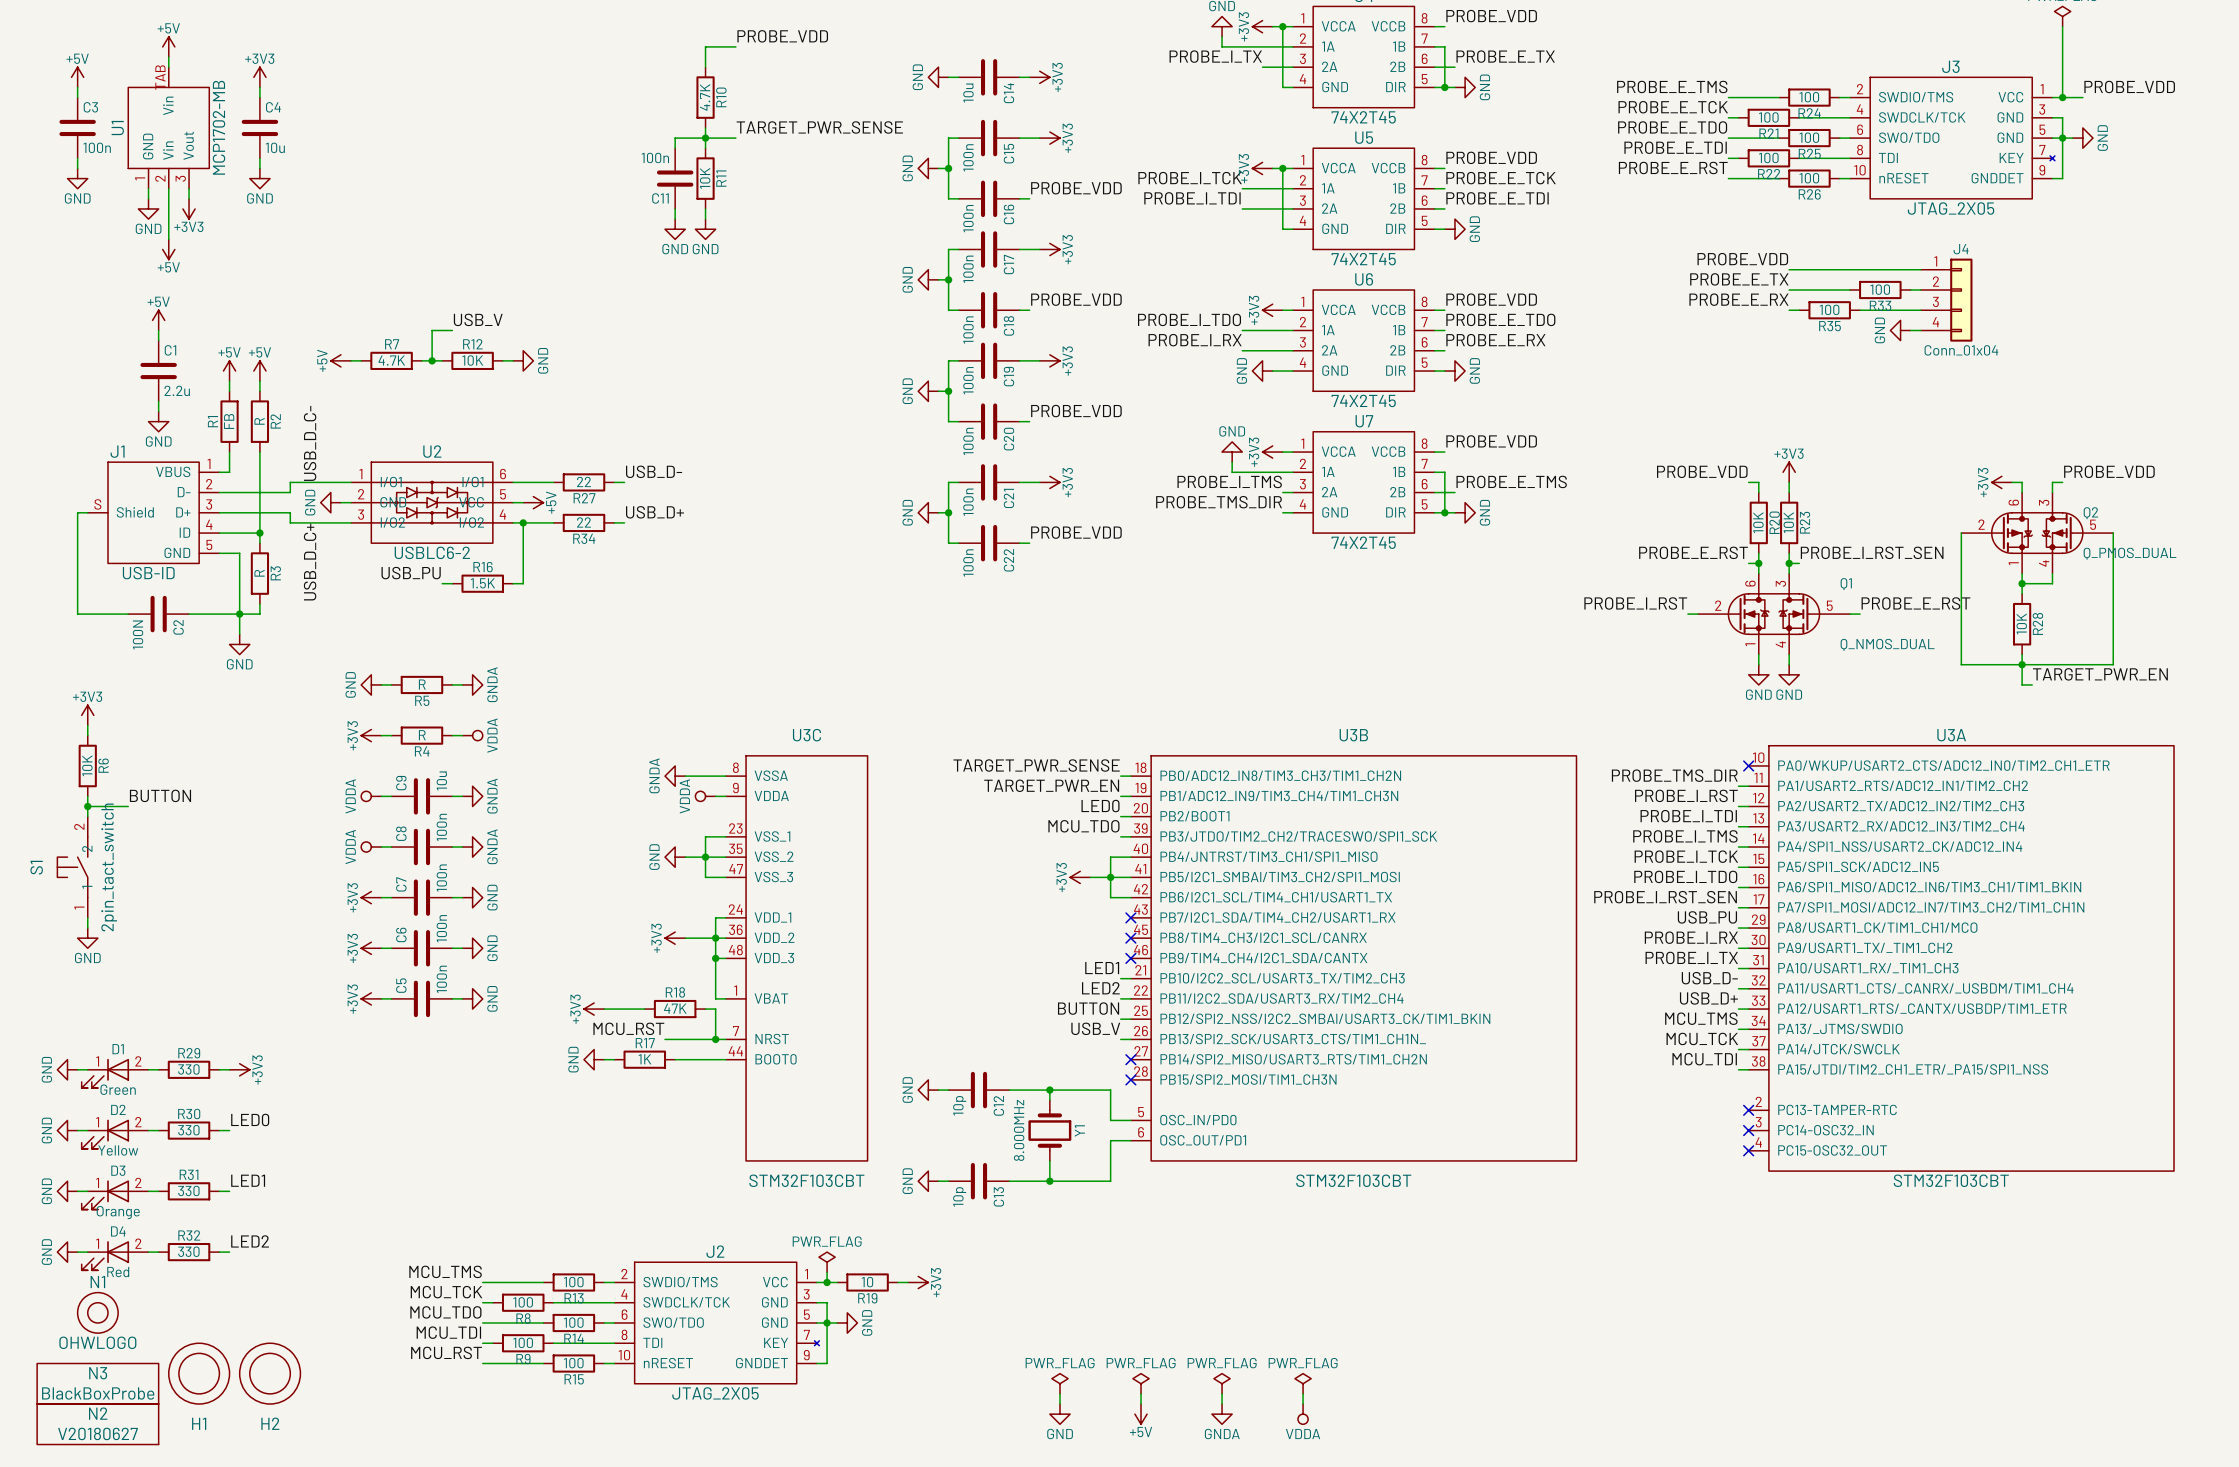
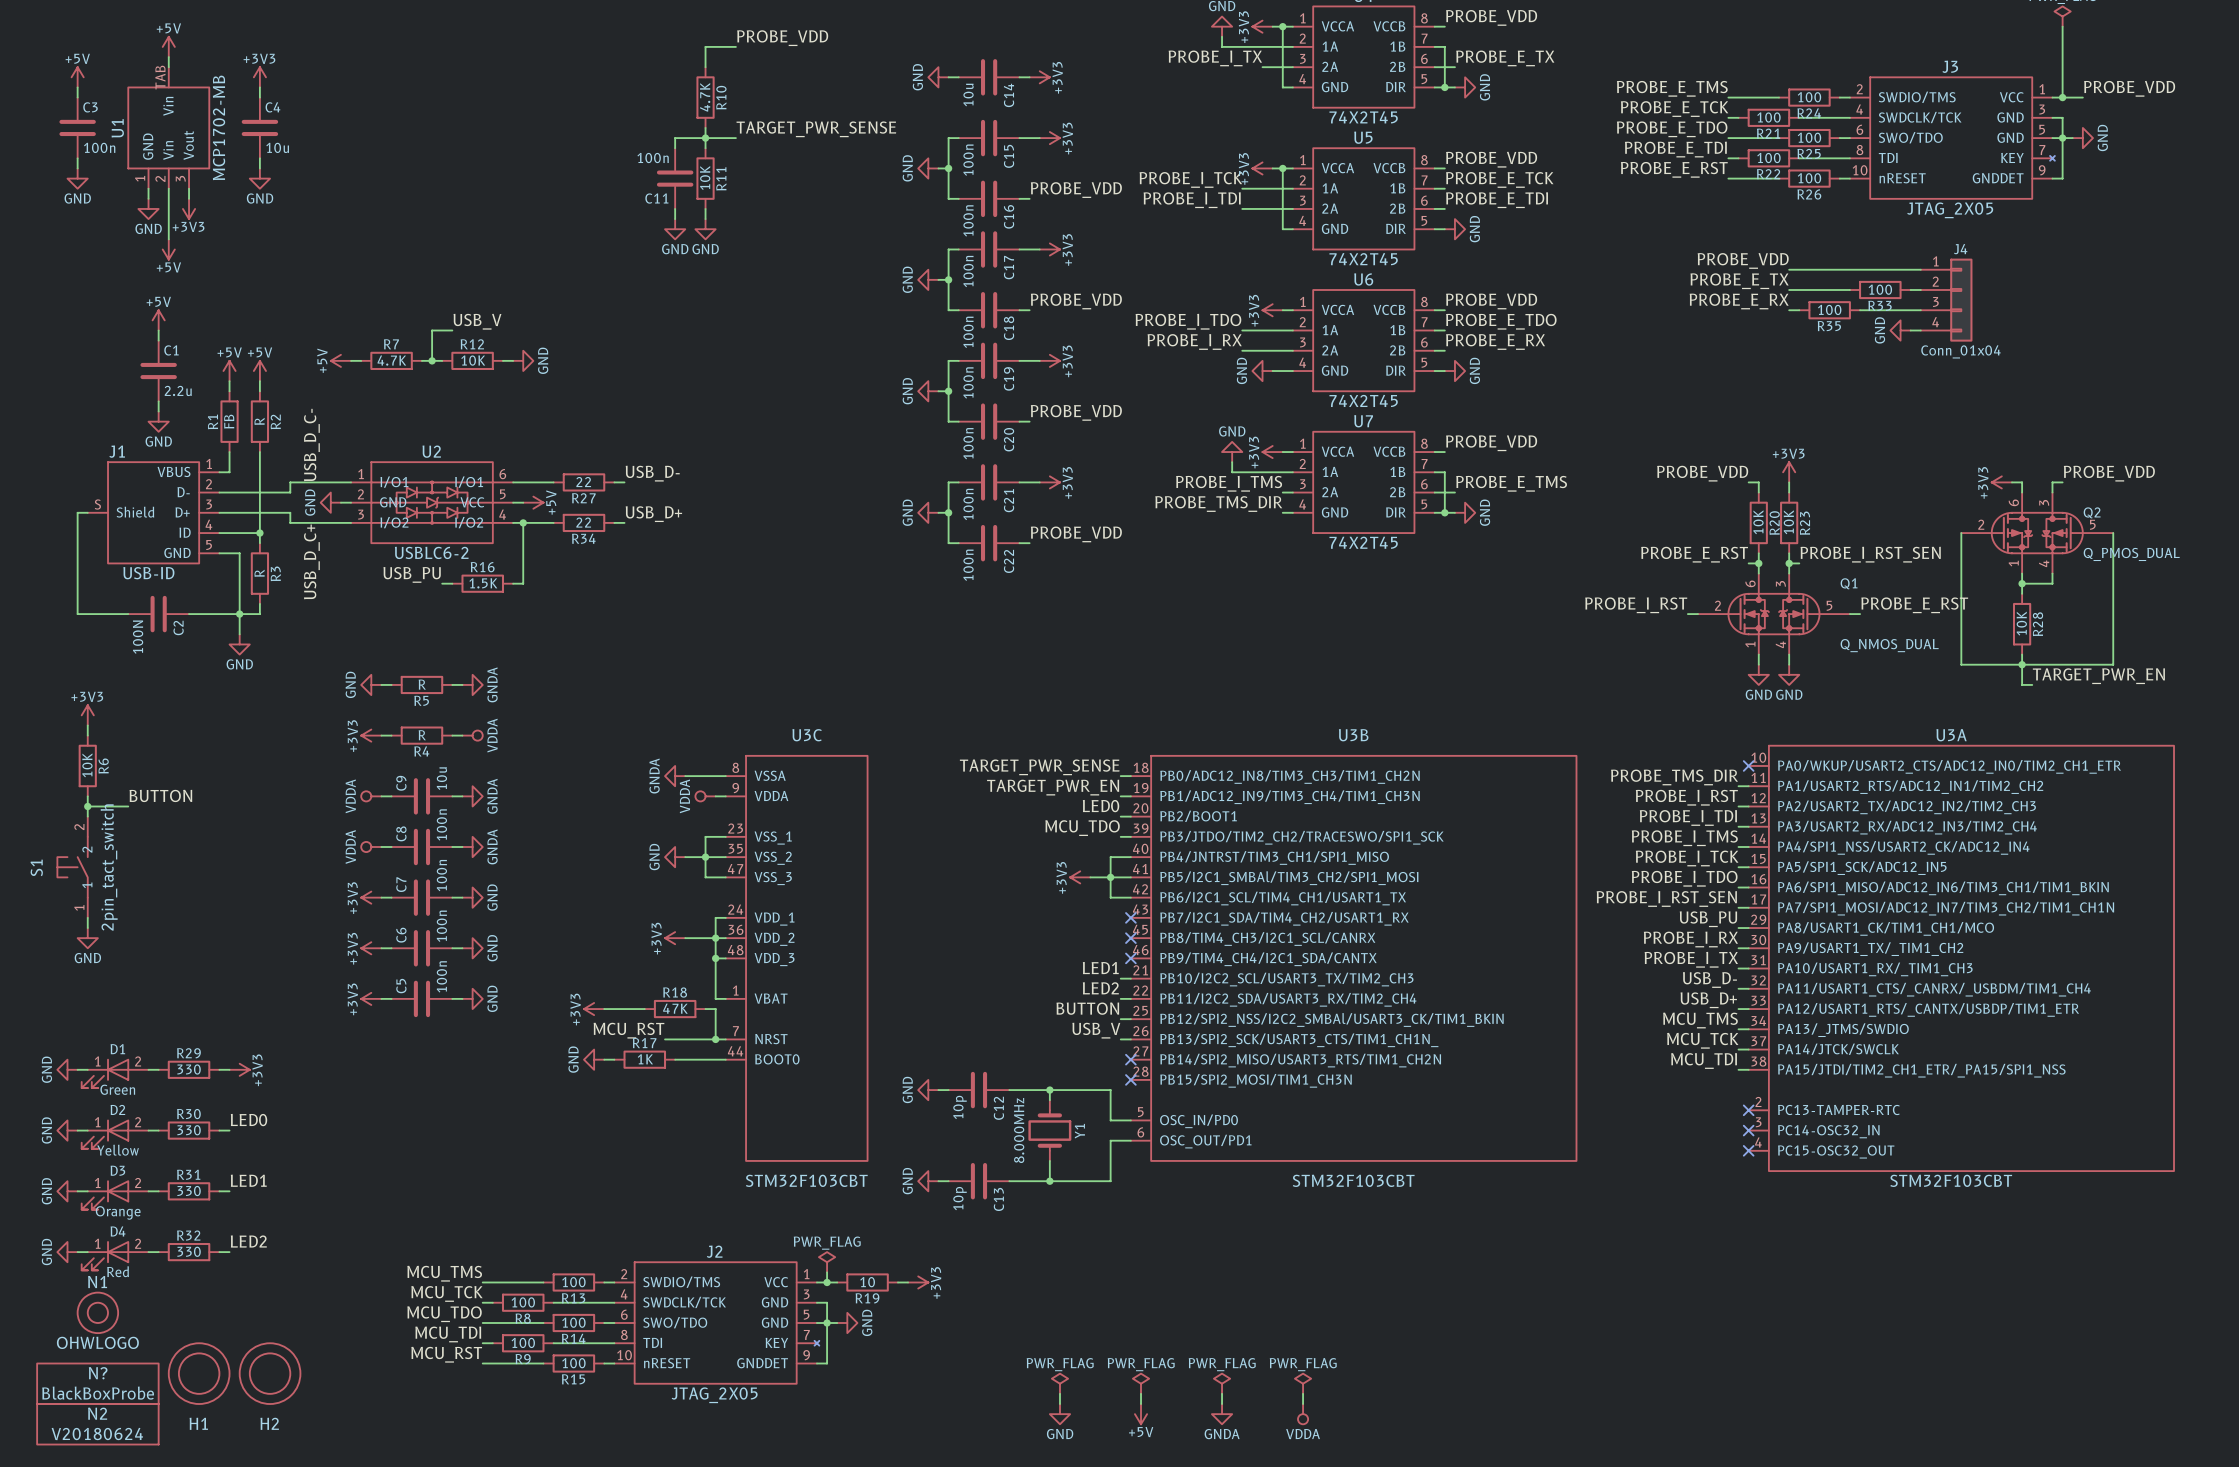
N3 name: N3 (98, 1373) -> N? (98, 1373)
N2 value: V20180627 (97, 1433) -> V20180624 (97, 1434)

